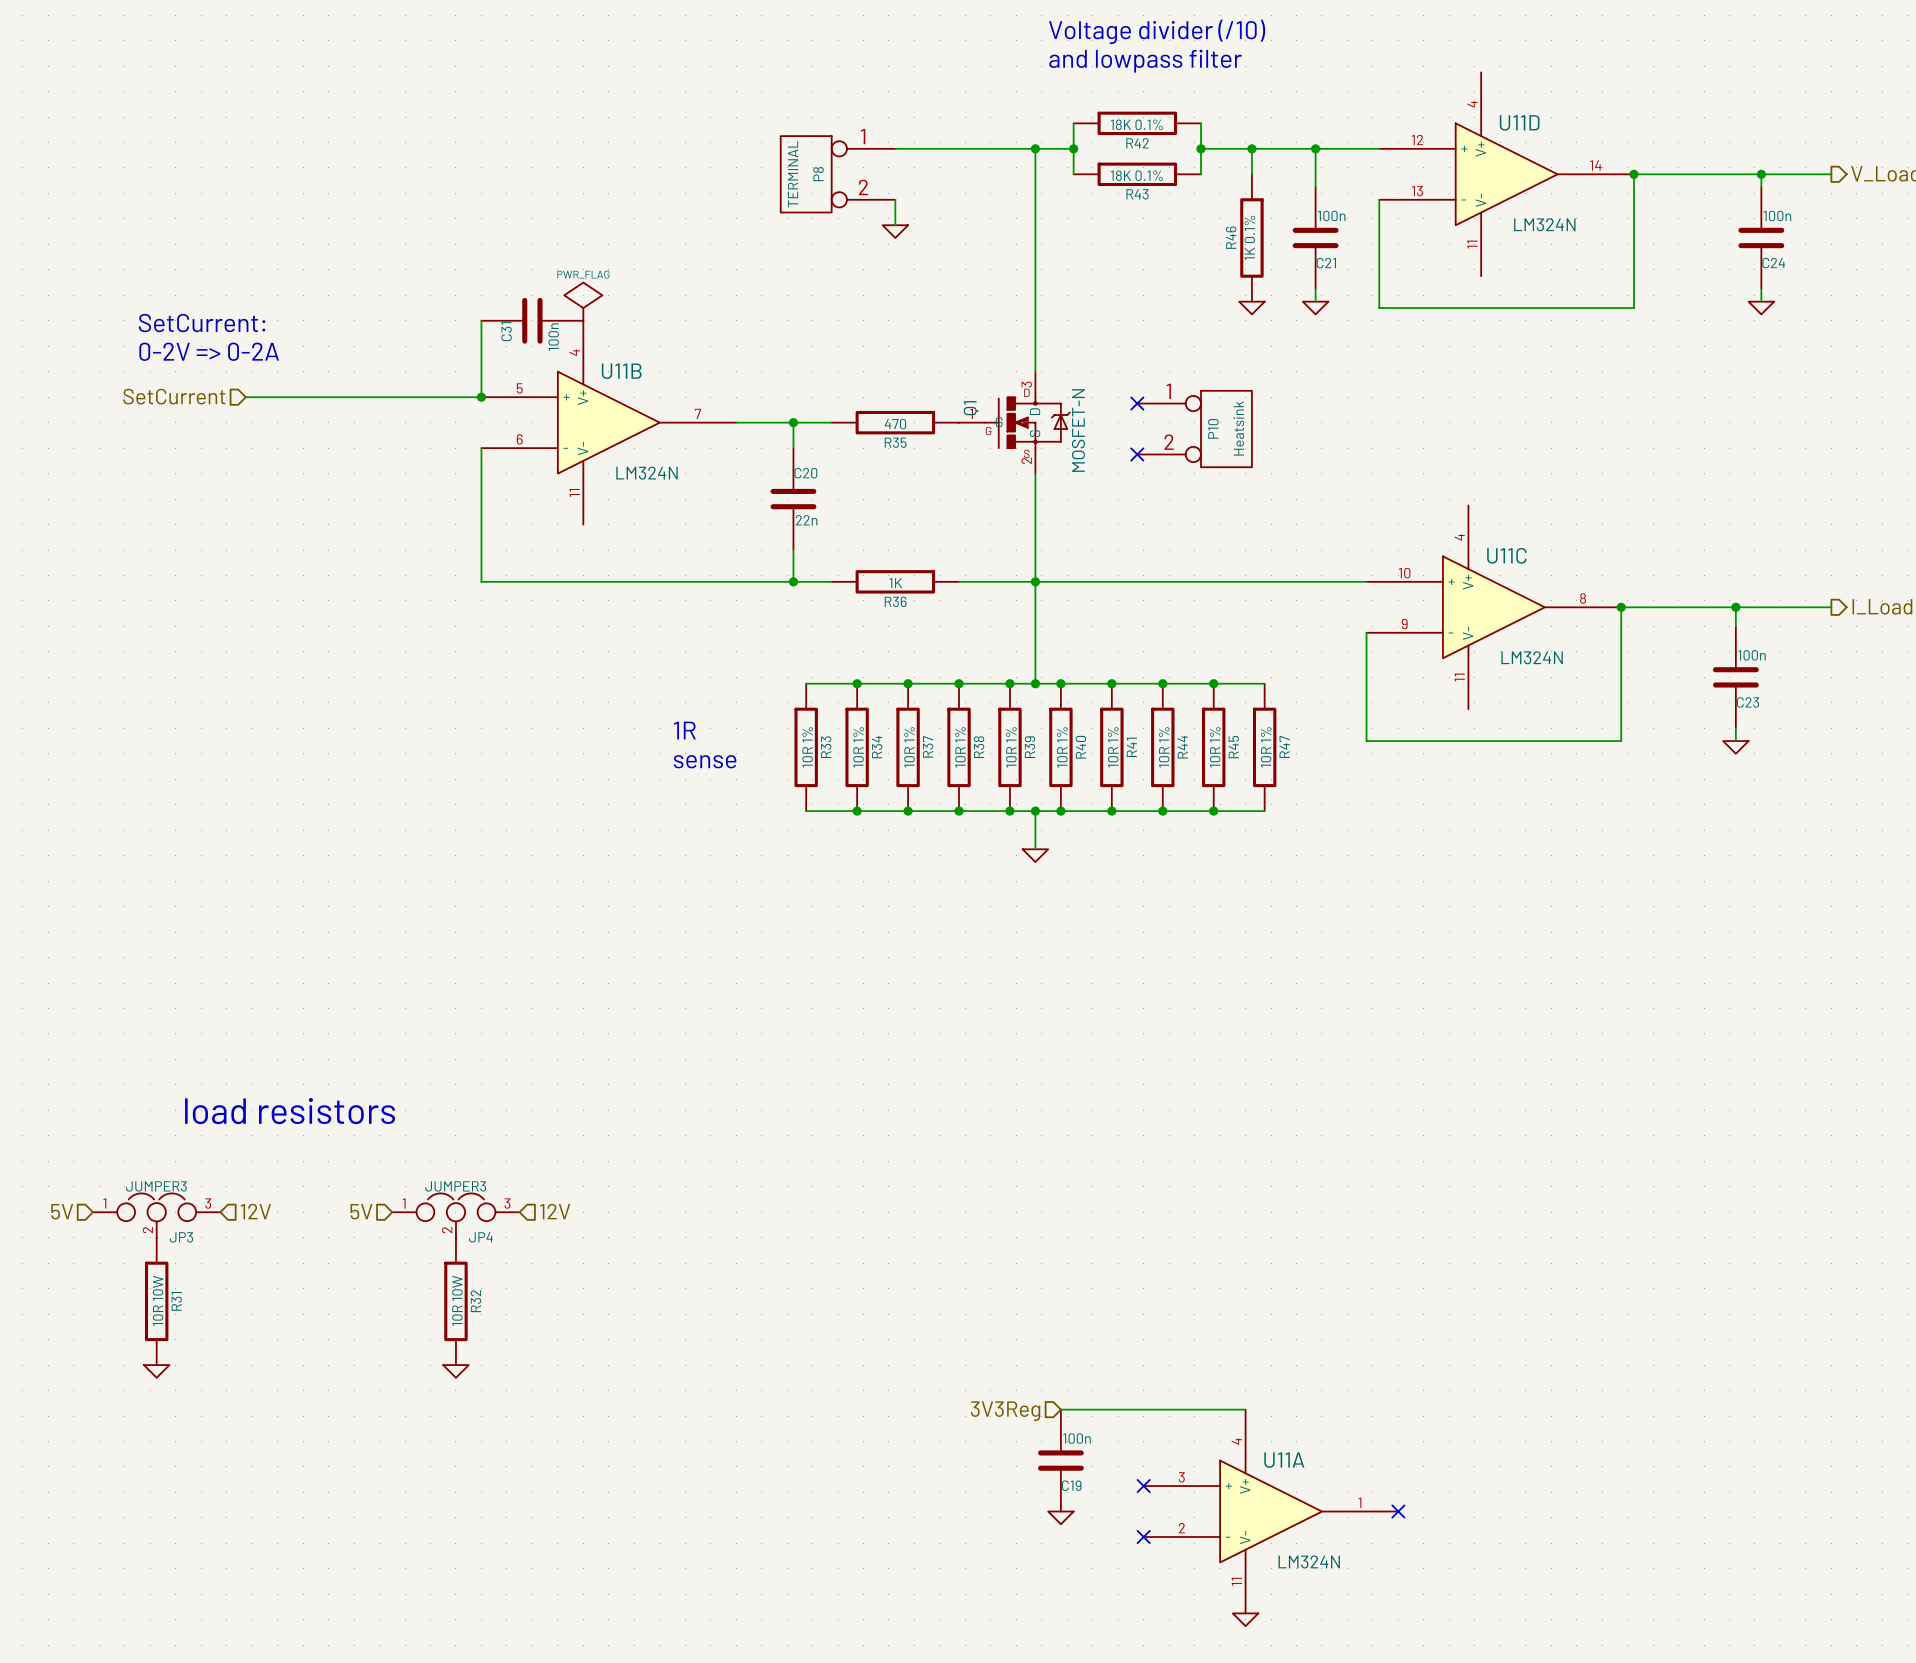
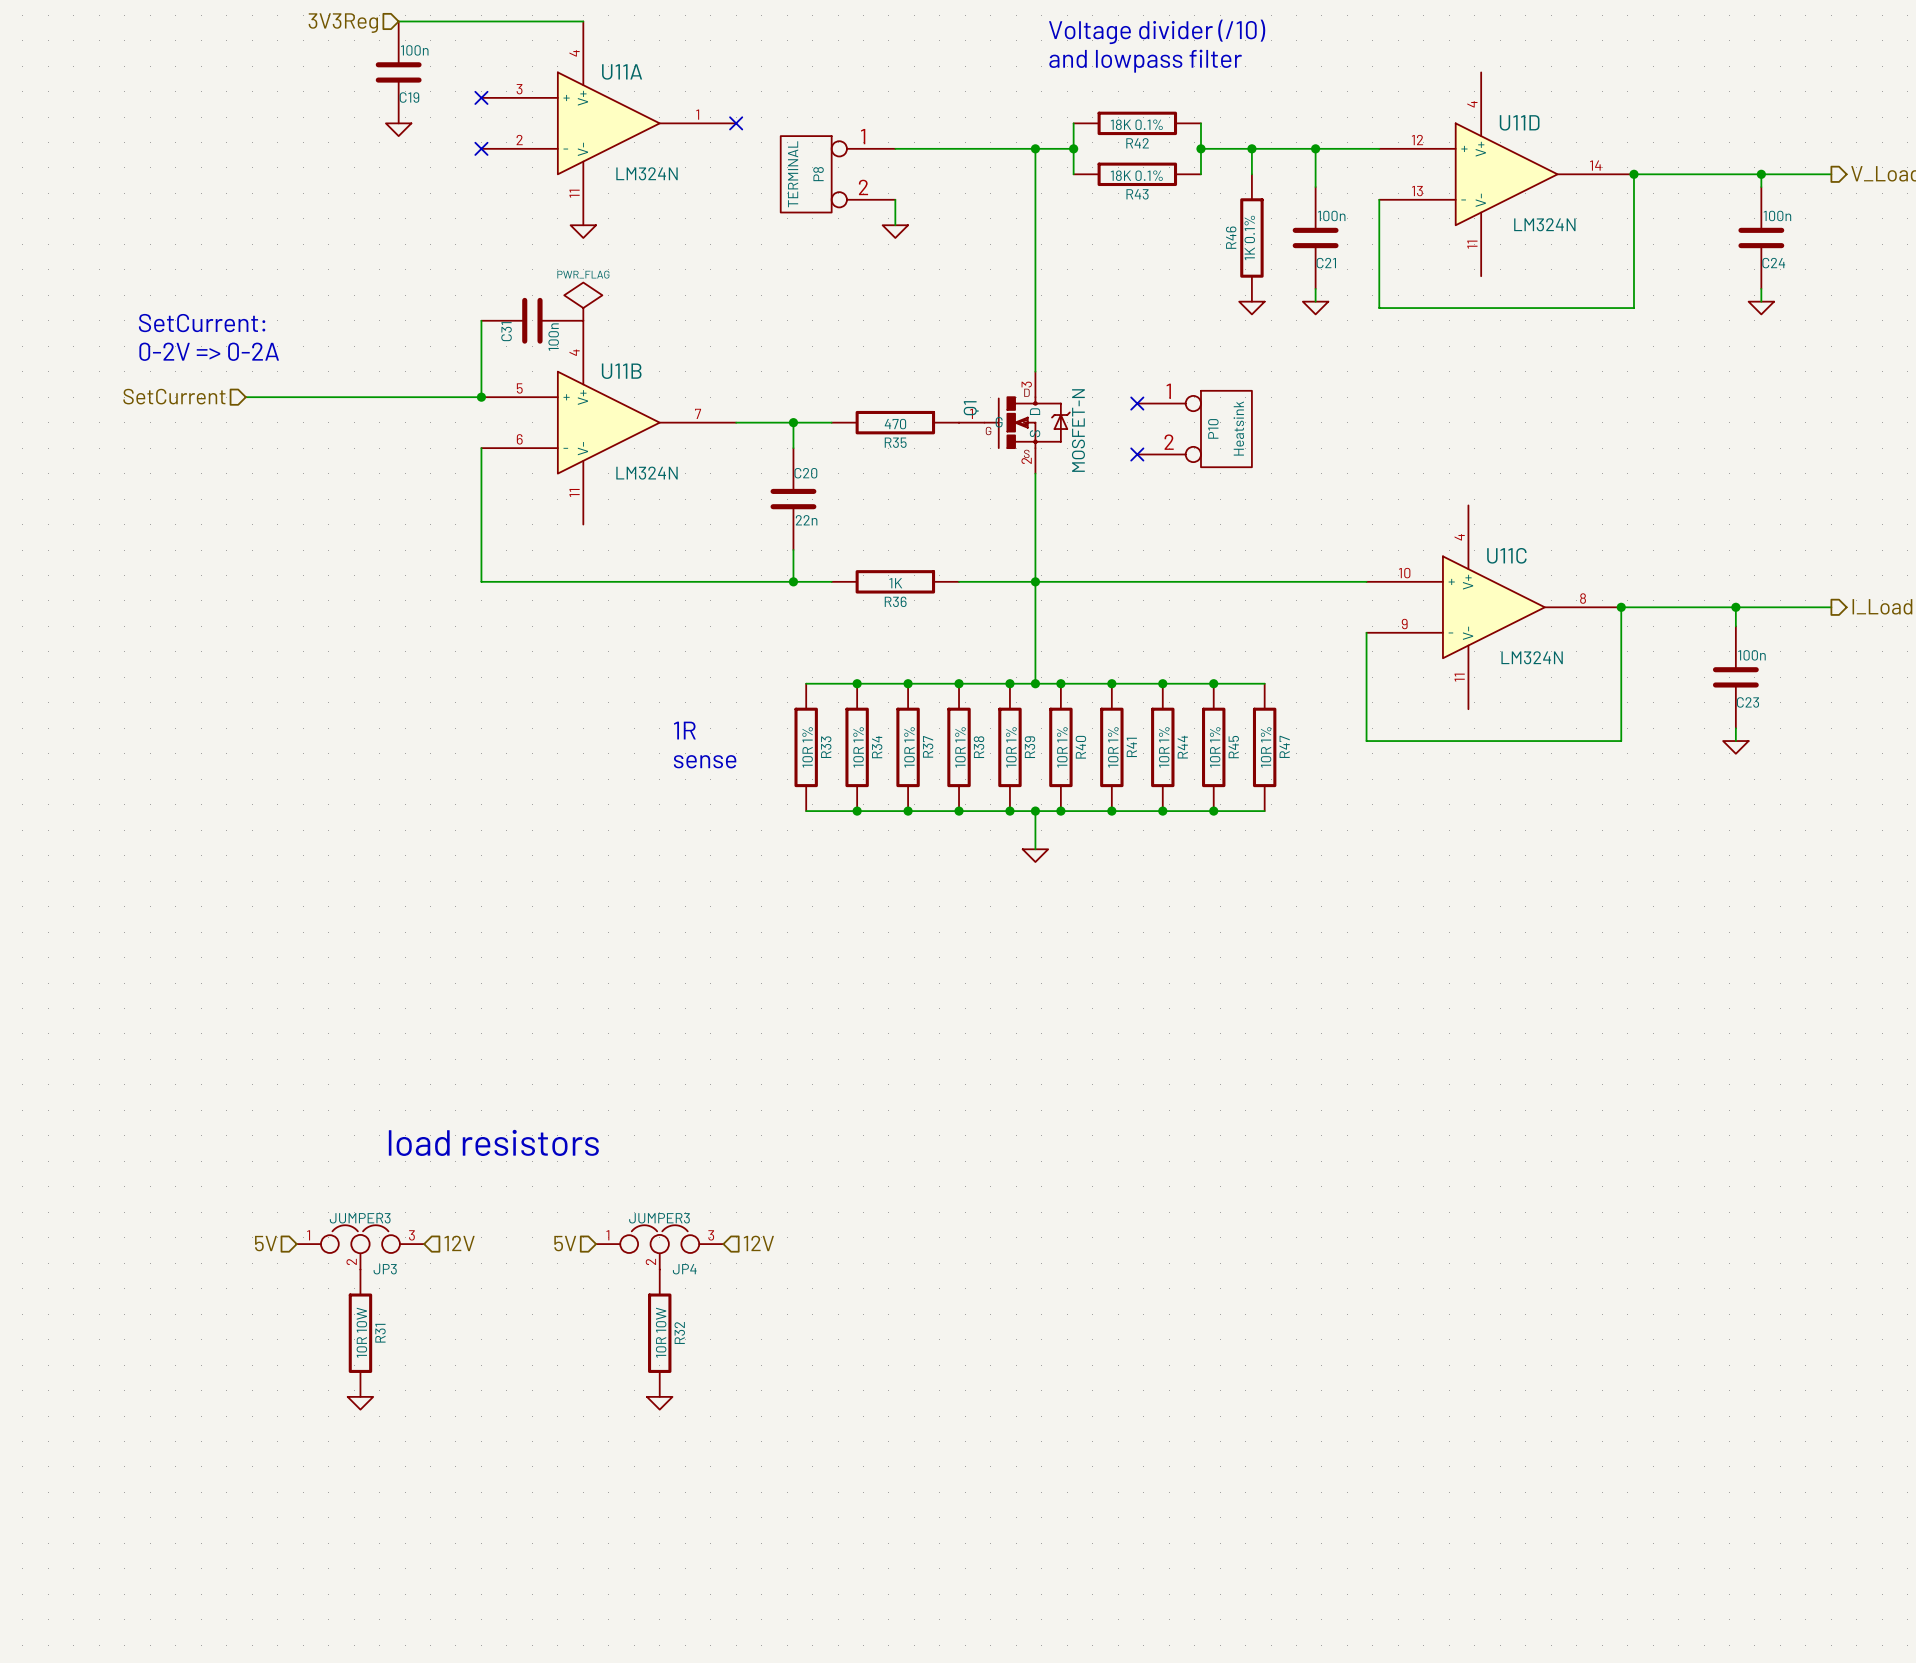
wire: none -> (398, 21) (583, 21)
hierarchical label: none -> 3V3Reg (343, 23)
no-connect mark: none -> (481, 97)
no-connect mark: none -> (736, 123)
power symbol: none -> (398, 129)
no-connect mark: none -> (481, 148)
power symbol: none -> (583, 231)
text position: load resistors (290, 1111) -> load resistors (493, 1142)
hierarchical label: 5V (62, 1211) -> none
hierarchical label: 12V (255, 1211) -> none
hierarchical label position: 5V (361, 1211) -> 5V (265, 1243)
hierarchical label position: 12V (555, 1211) -> 12V (459, 1243)
JP3 position: (156, 1215) -> (360, 1247)
JP4 position: (455, 1215) -> (659, 1247)
hierarchical label: none -> 5V (565, 1243)
hierarchical label: none -> 12V (758, 1243)
R31 position: (156, 1301) -> (360, 1333)
R32 position: (455, 1301) -> (659, 1333)
power symbol: (156, 1371) -> none
power symbol position: (455, 1371) -> (360, 1403)
power symbol: none -> (659, 1403)
wire: (1060, 1409) (1245, 1409) -> none
hierarchical label: 3V3Reg (1005, 1411) -> none
C19 position: (1060, 1460) -> (398, 72)
no-connect mark: (1143, 1486) -> none
U11A position: (1271, 1511) -> (608, 123)
no-connect mark: (1398, 1511) -> none
power symbol: (1060, 1517) -> none
no-connect mark: (1143, 1536) -> none
power symbol: (1245, 1619) -> none

